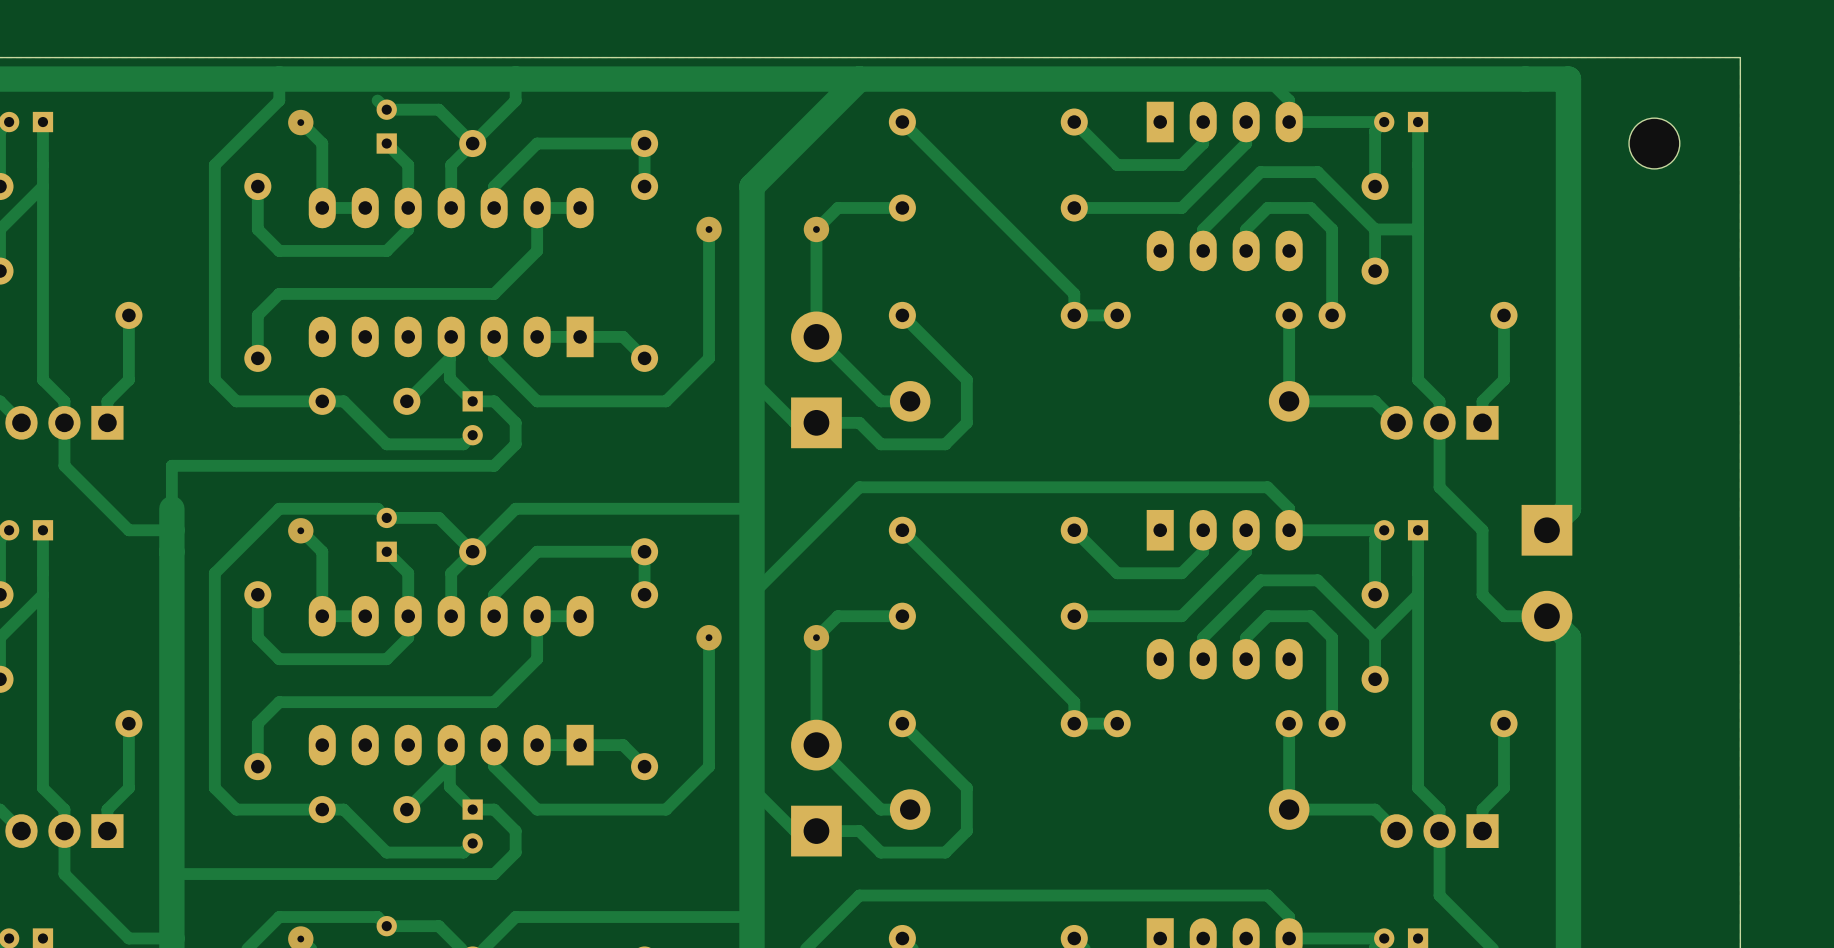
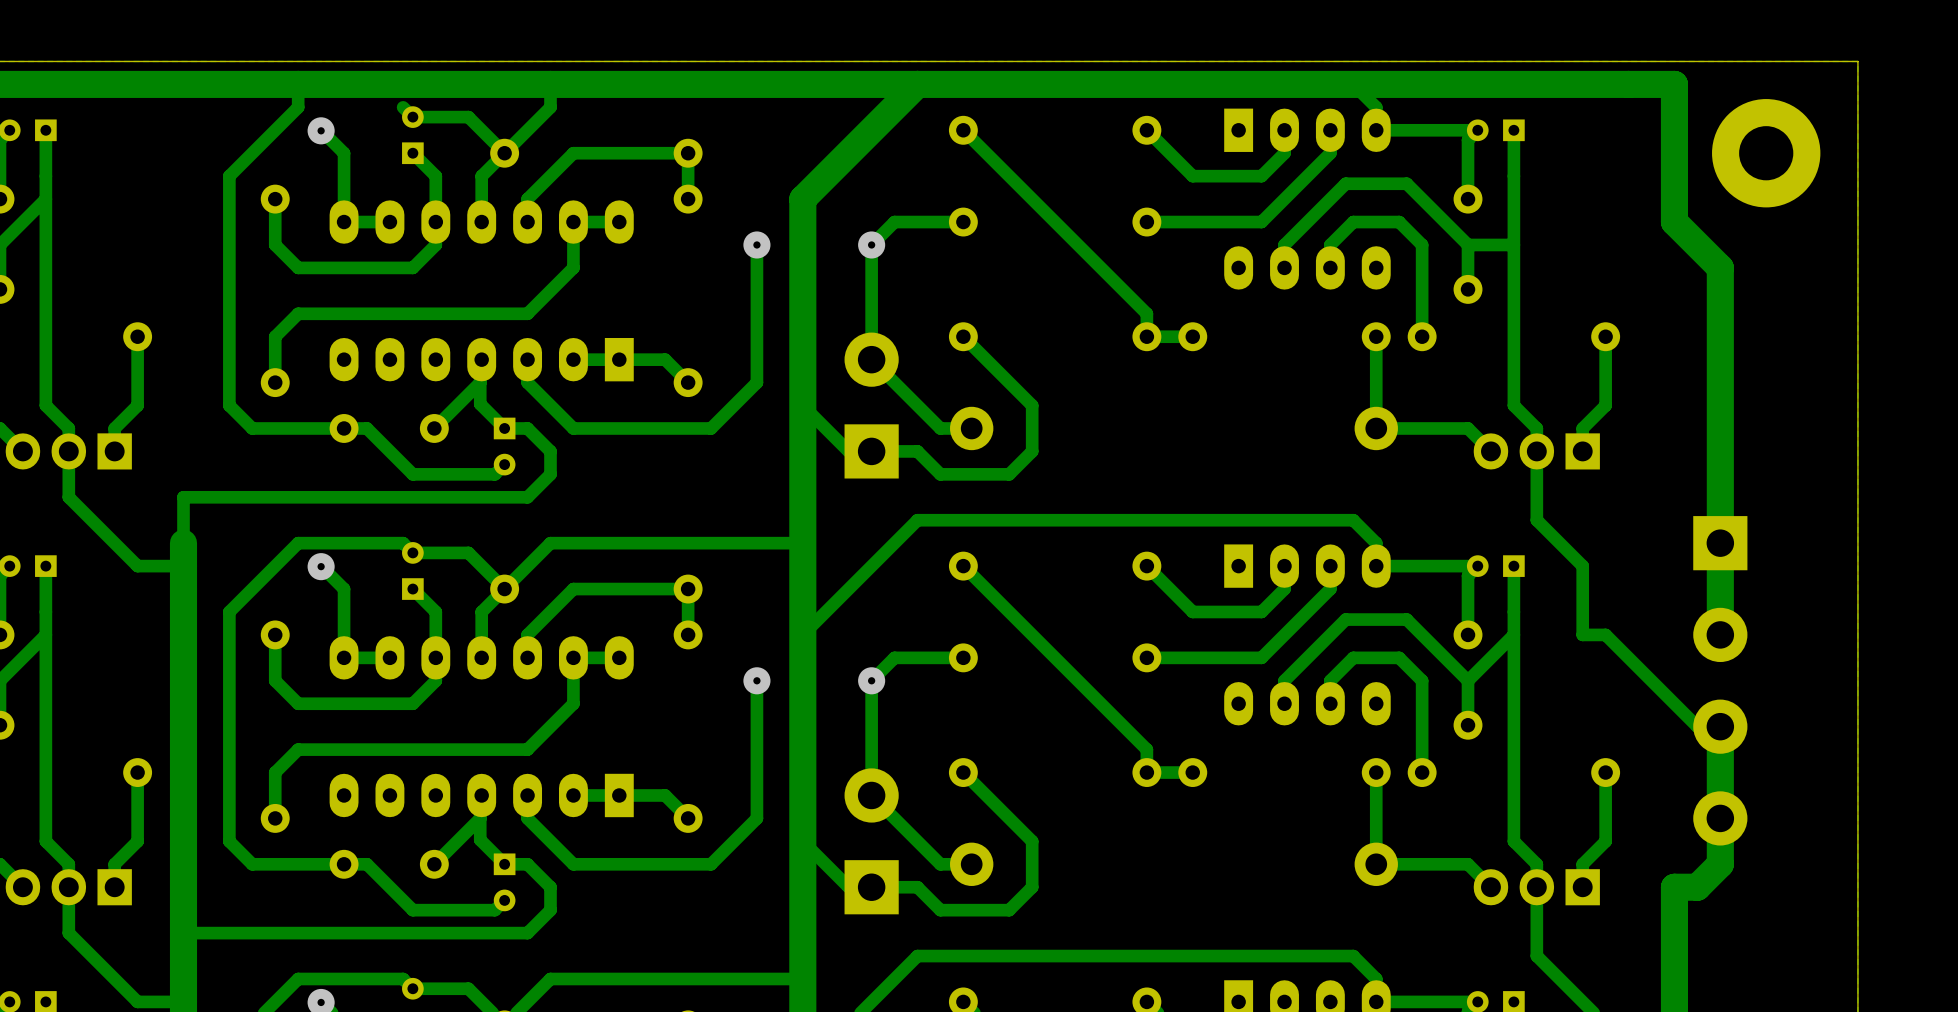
part footprint: [1629, 118, 1680, 169] -> [1712, 99, 1821, 208]
track: (1568, 207) (1568, 508) (1546, 530) -> (1674, 222) (1720, 267) (1720, 634)
part: (1546, 573) -> none
track: (1482, 594) (1504, 616) (1546, 616) (1568, 637) (1568, 831) -> (1582, 634) (1605, 634) (1697, 726) (1720, 726) (1720, 864) (1697, 887) (1674, 887)
part: none -> (1720, 680)

